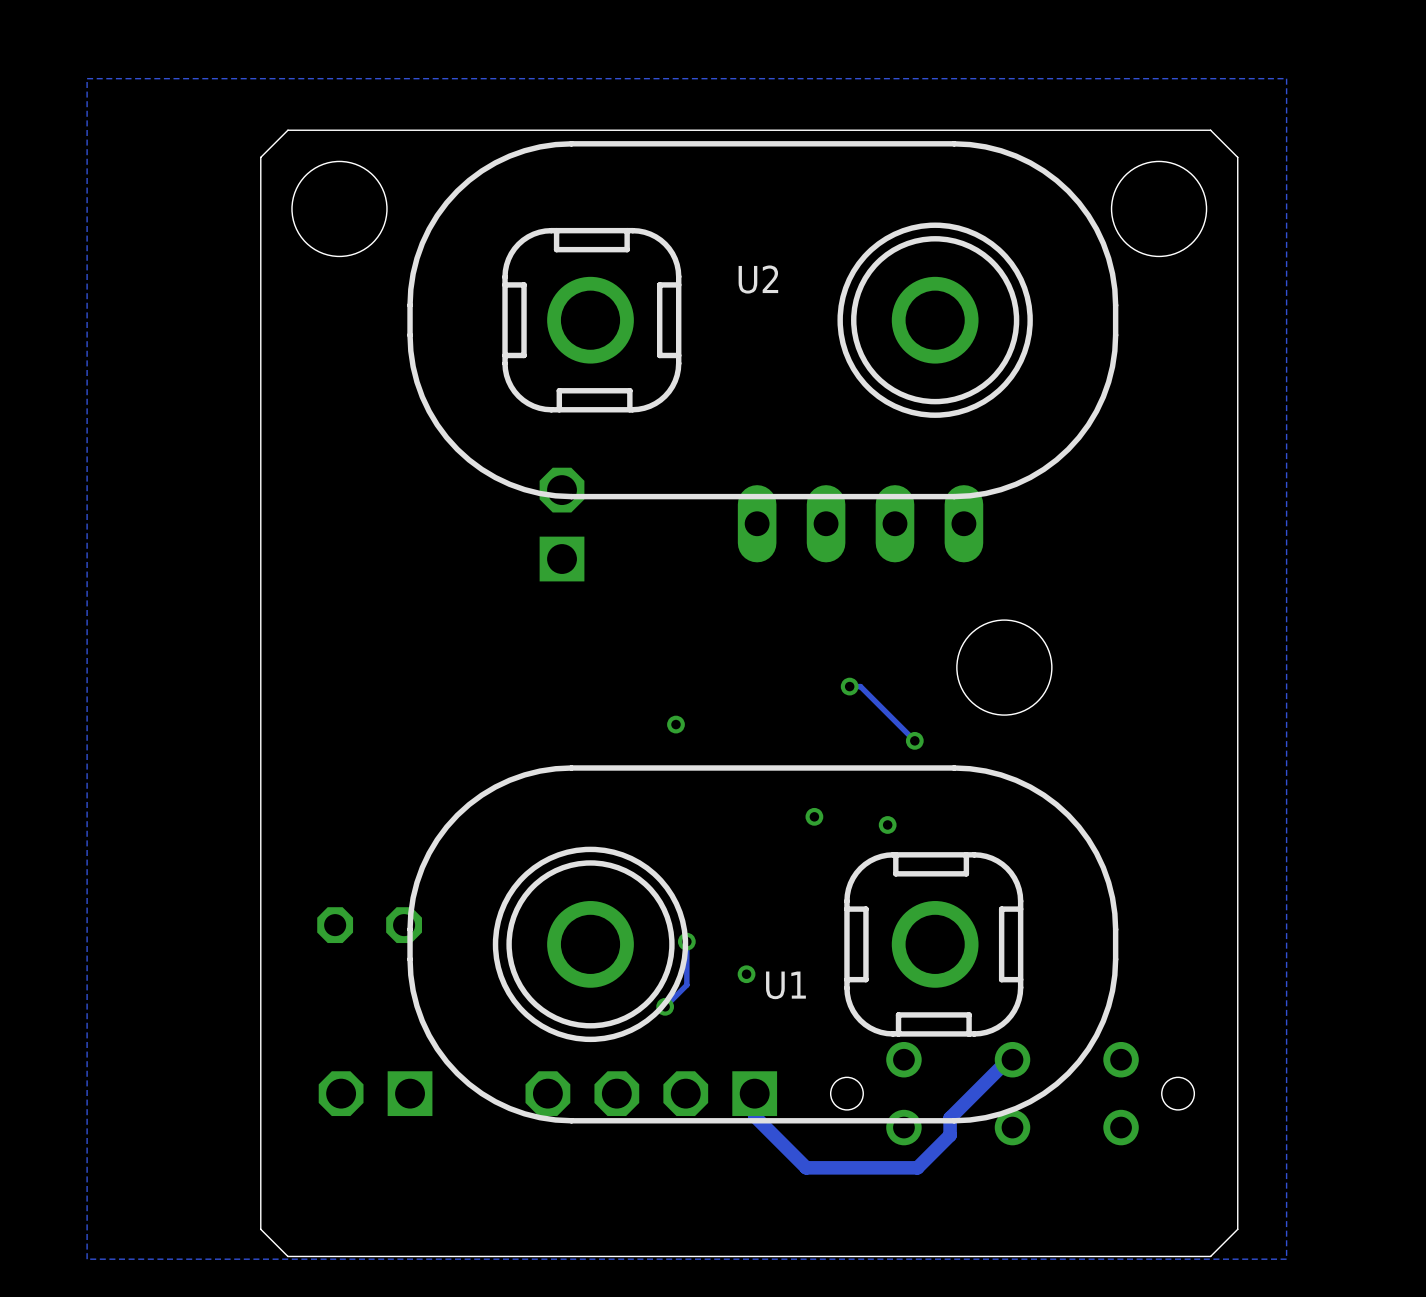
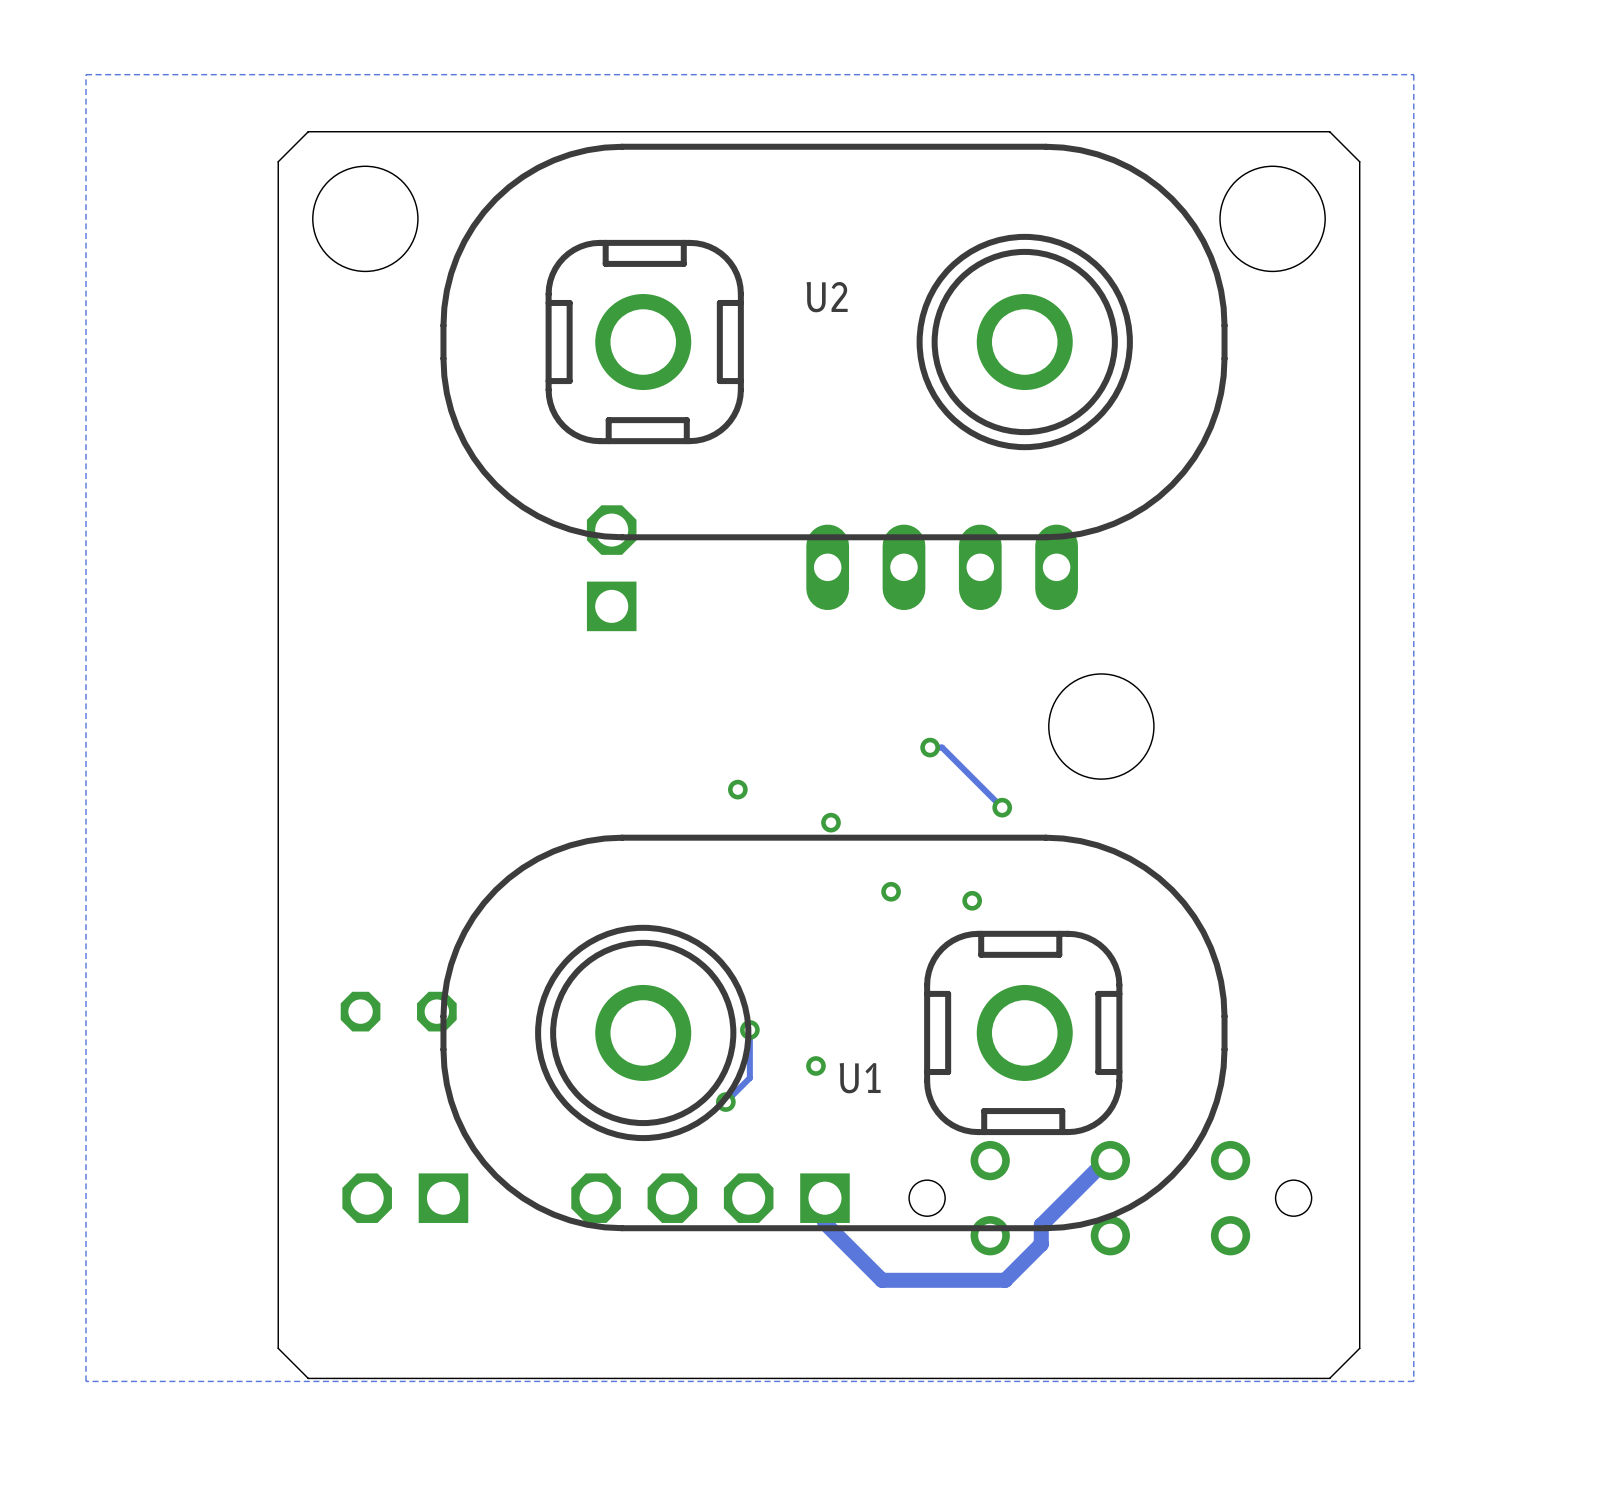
via: none -> (830, 822)

